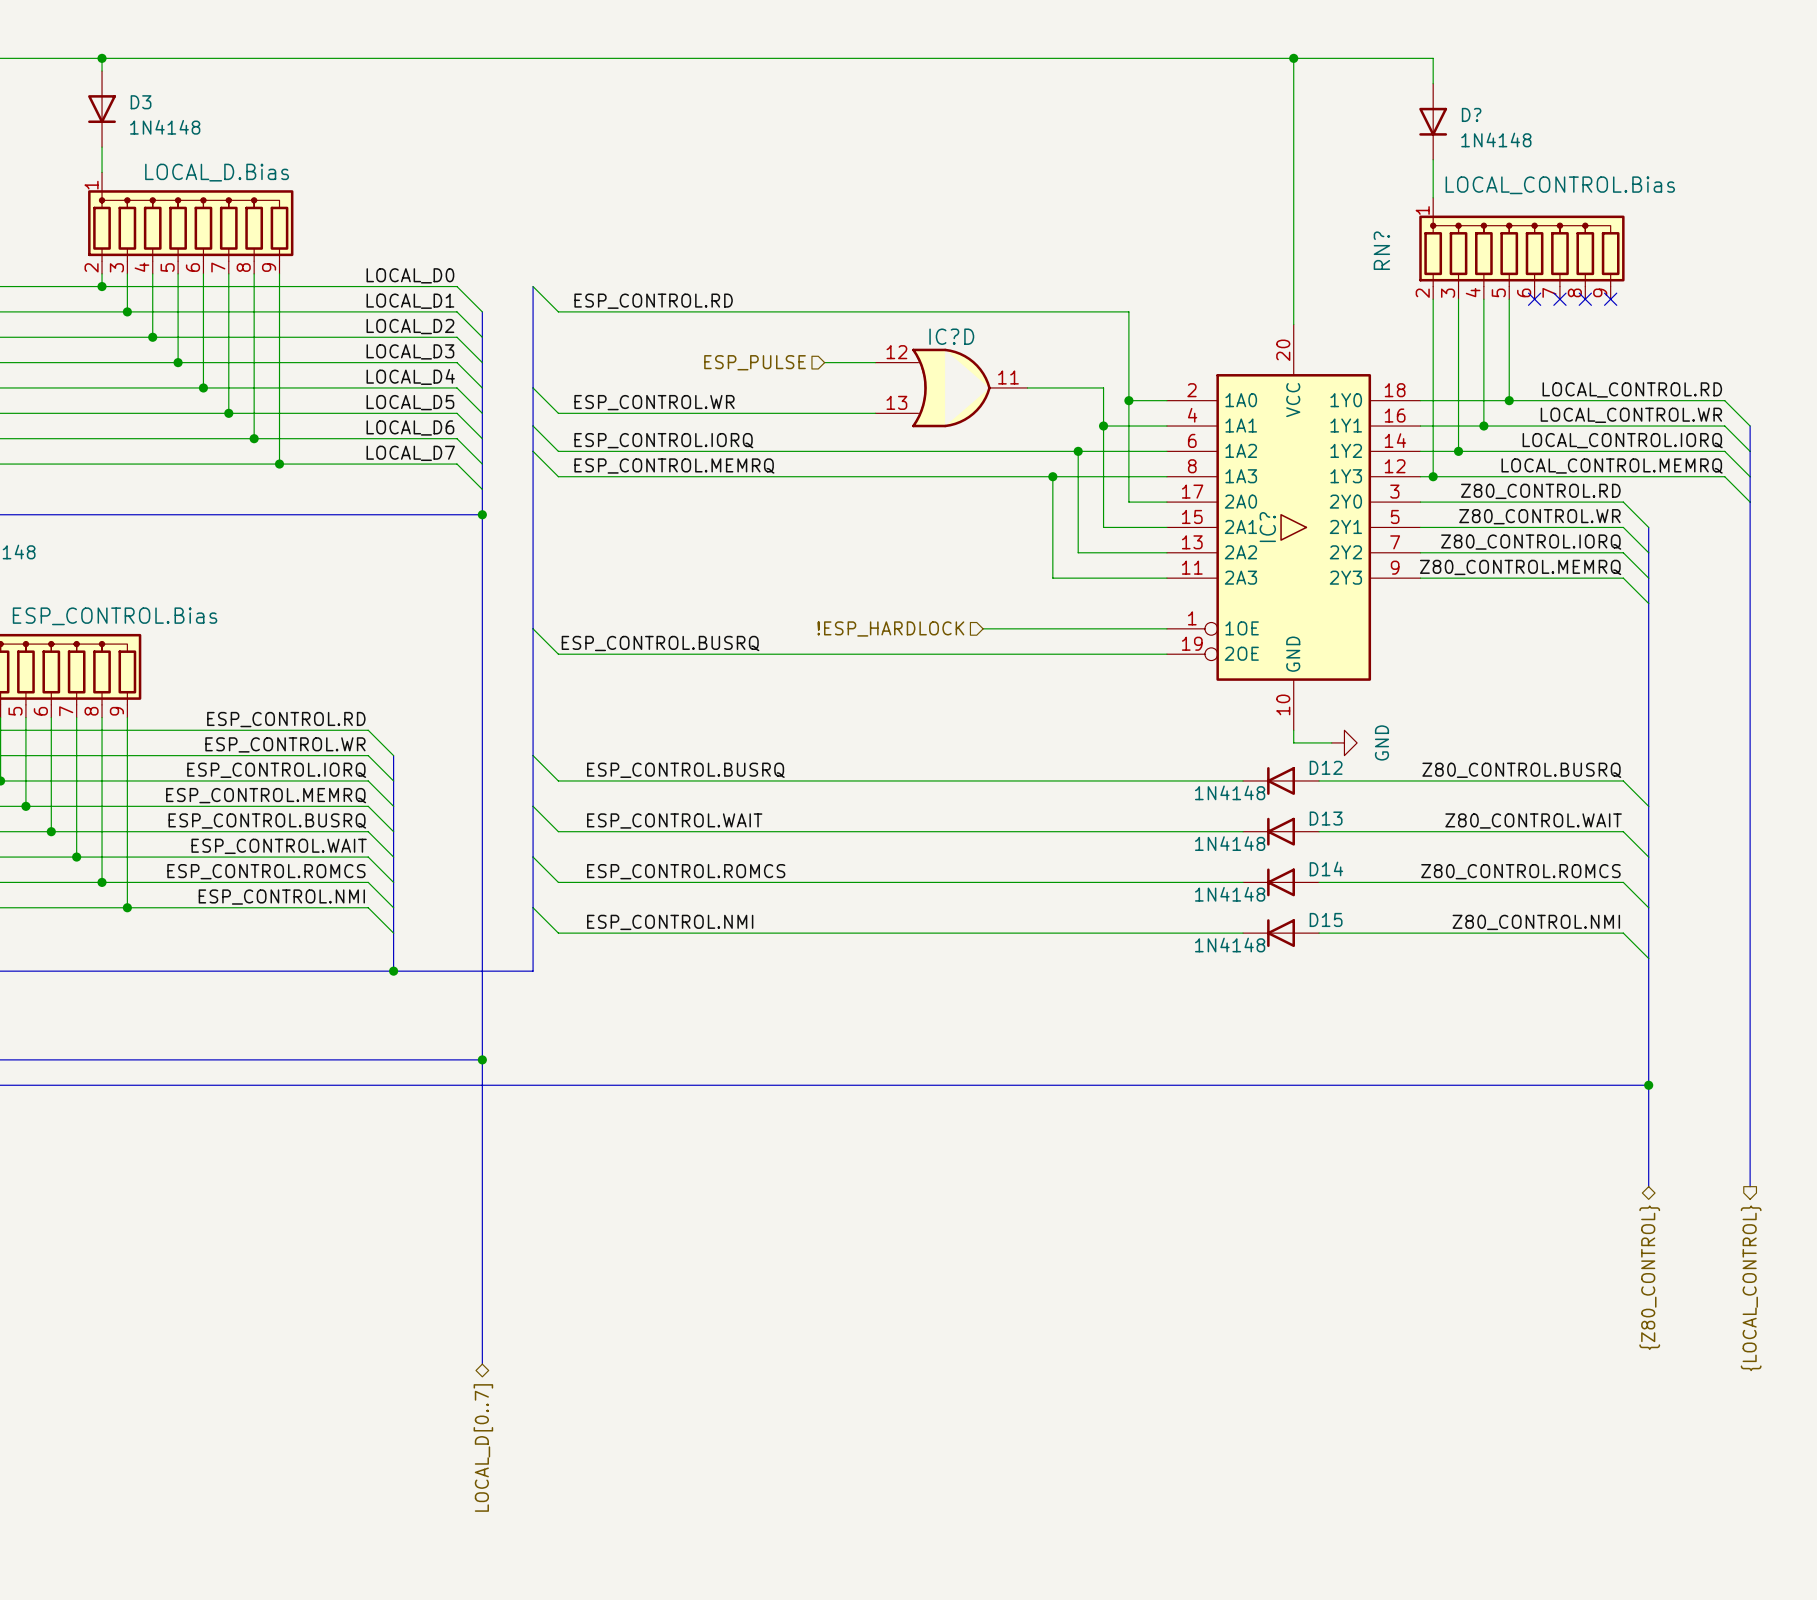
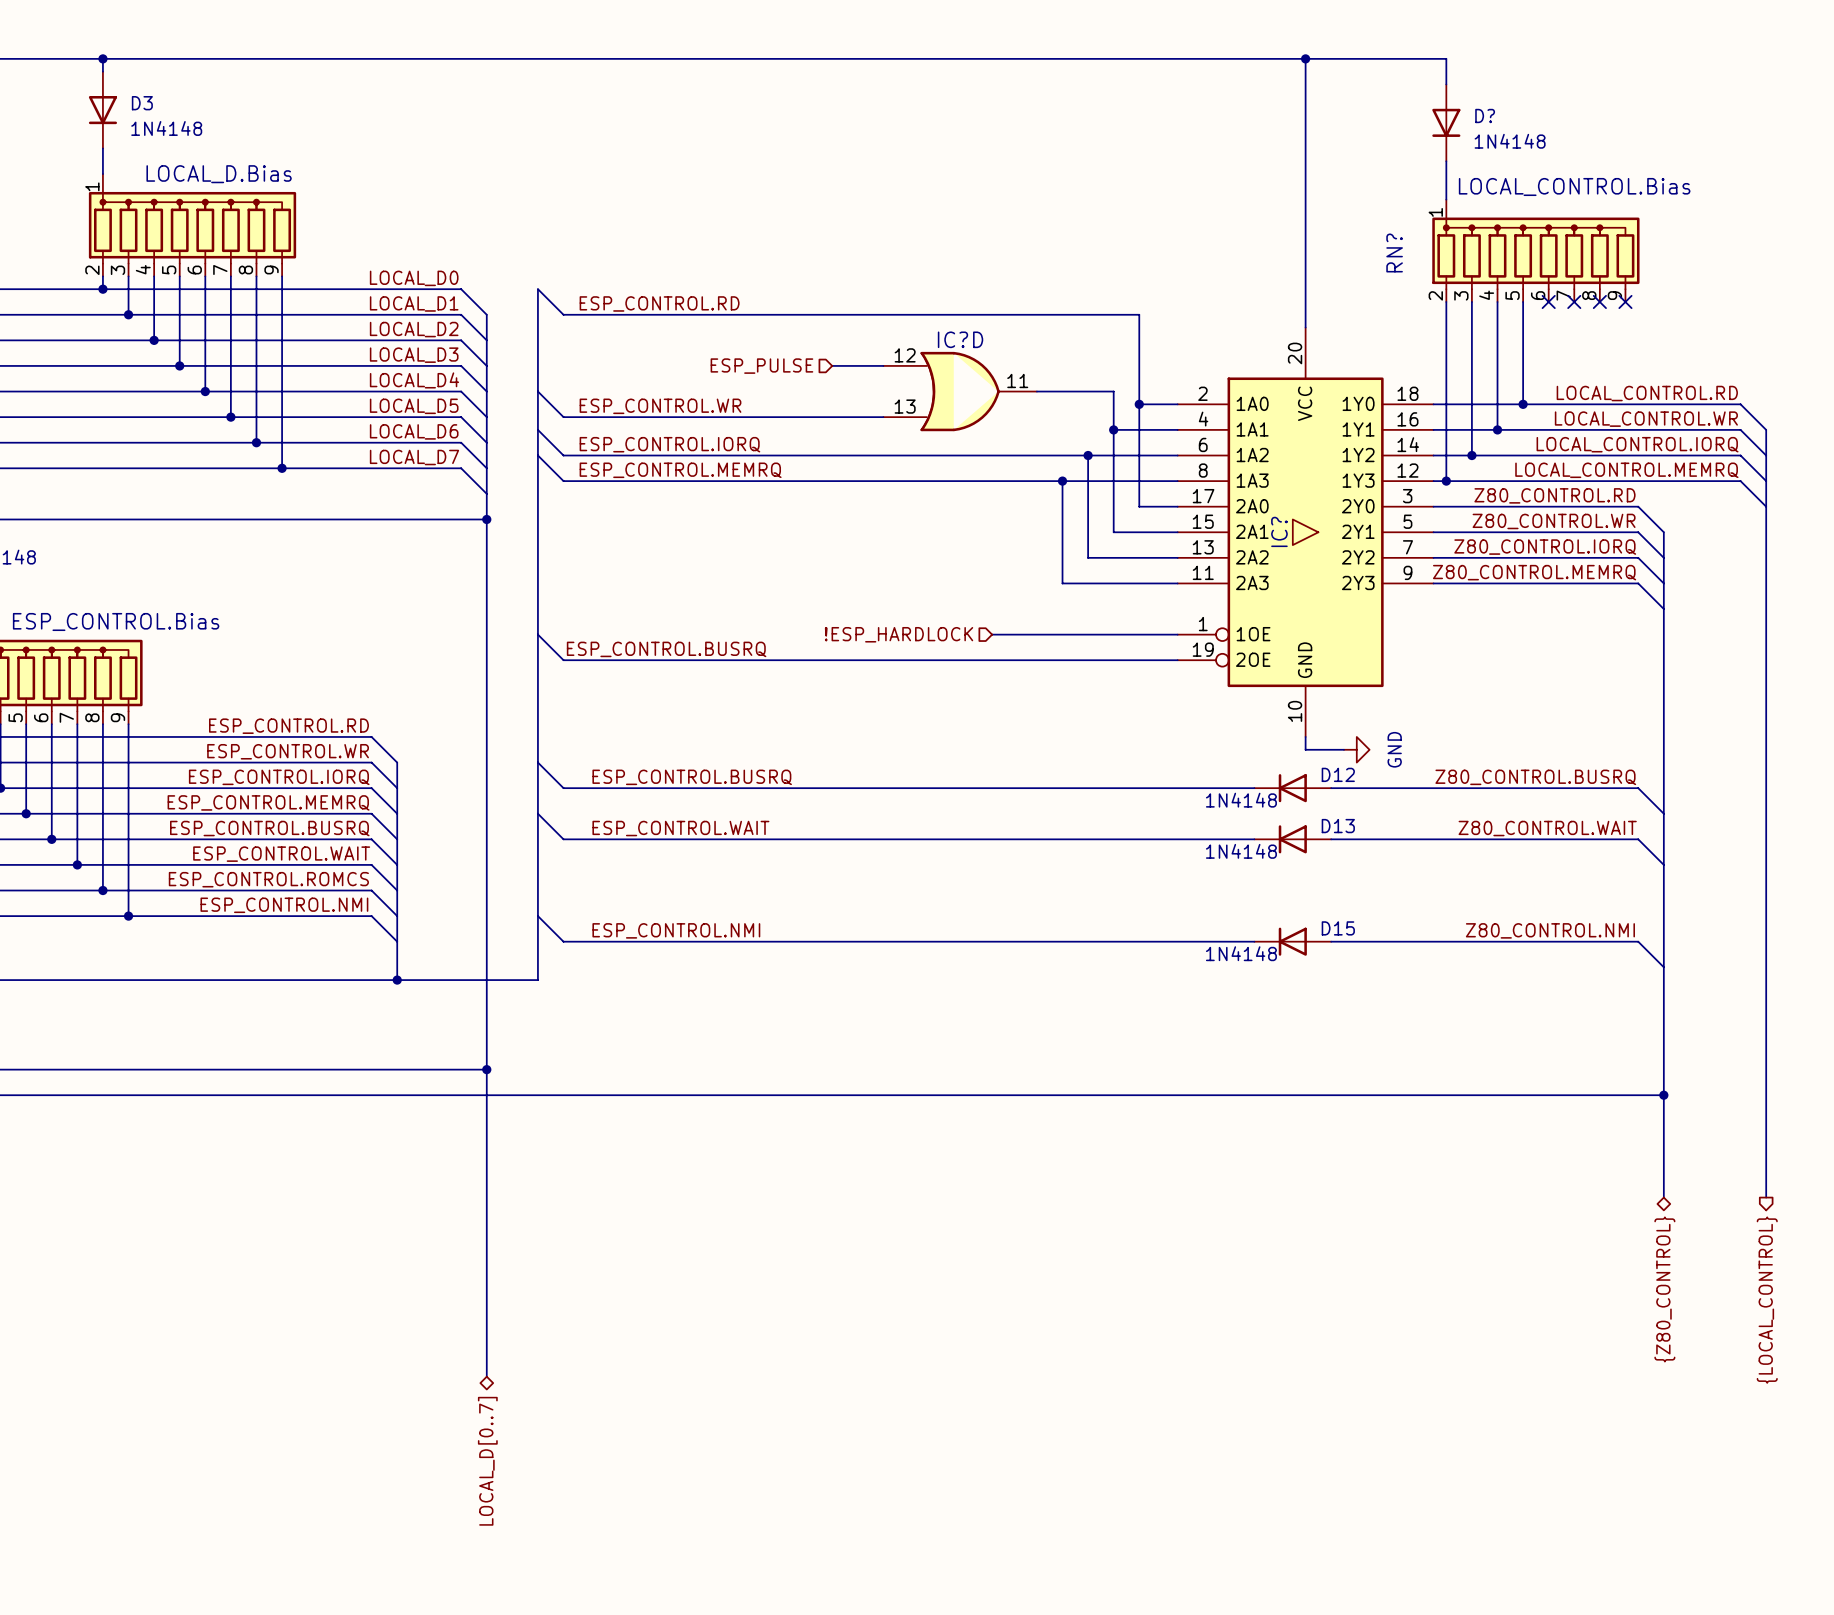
wire: (533, 857) (558, 882) (1243, 882) -> none
label: ESP_CONTROL.ROMCS (686, 871) -> none
label: Z80_CONTROL.ROMCS (1520, 871) -> none
D14: 1N4148 (1281, 882) -> none
wire: (1319, 882) (1623, 882) (1648, 907) -> none

